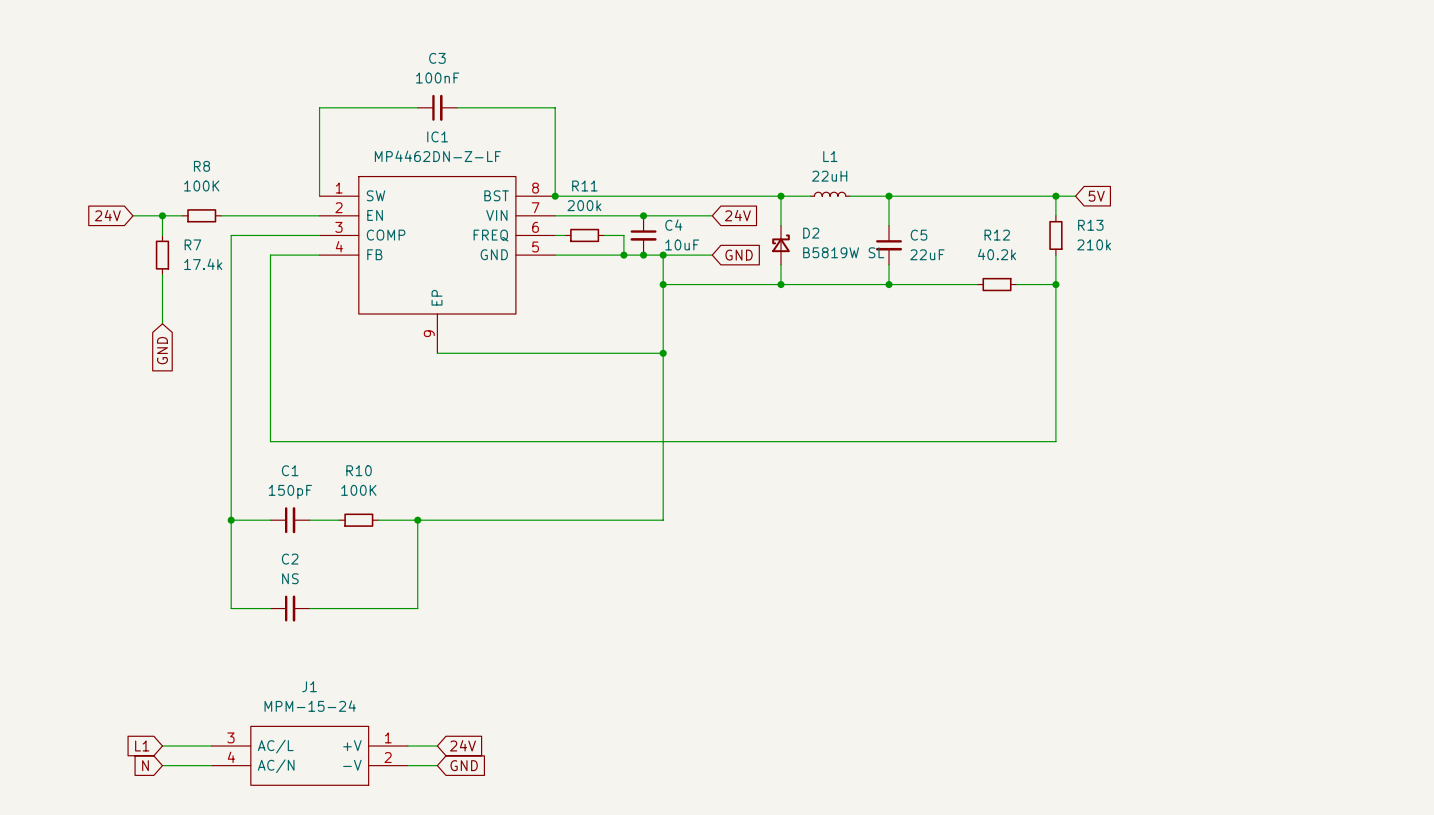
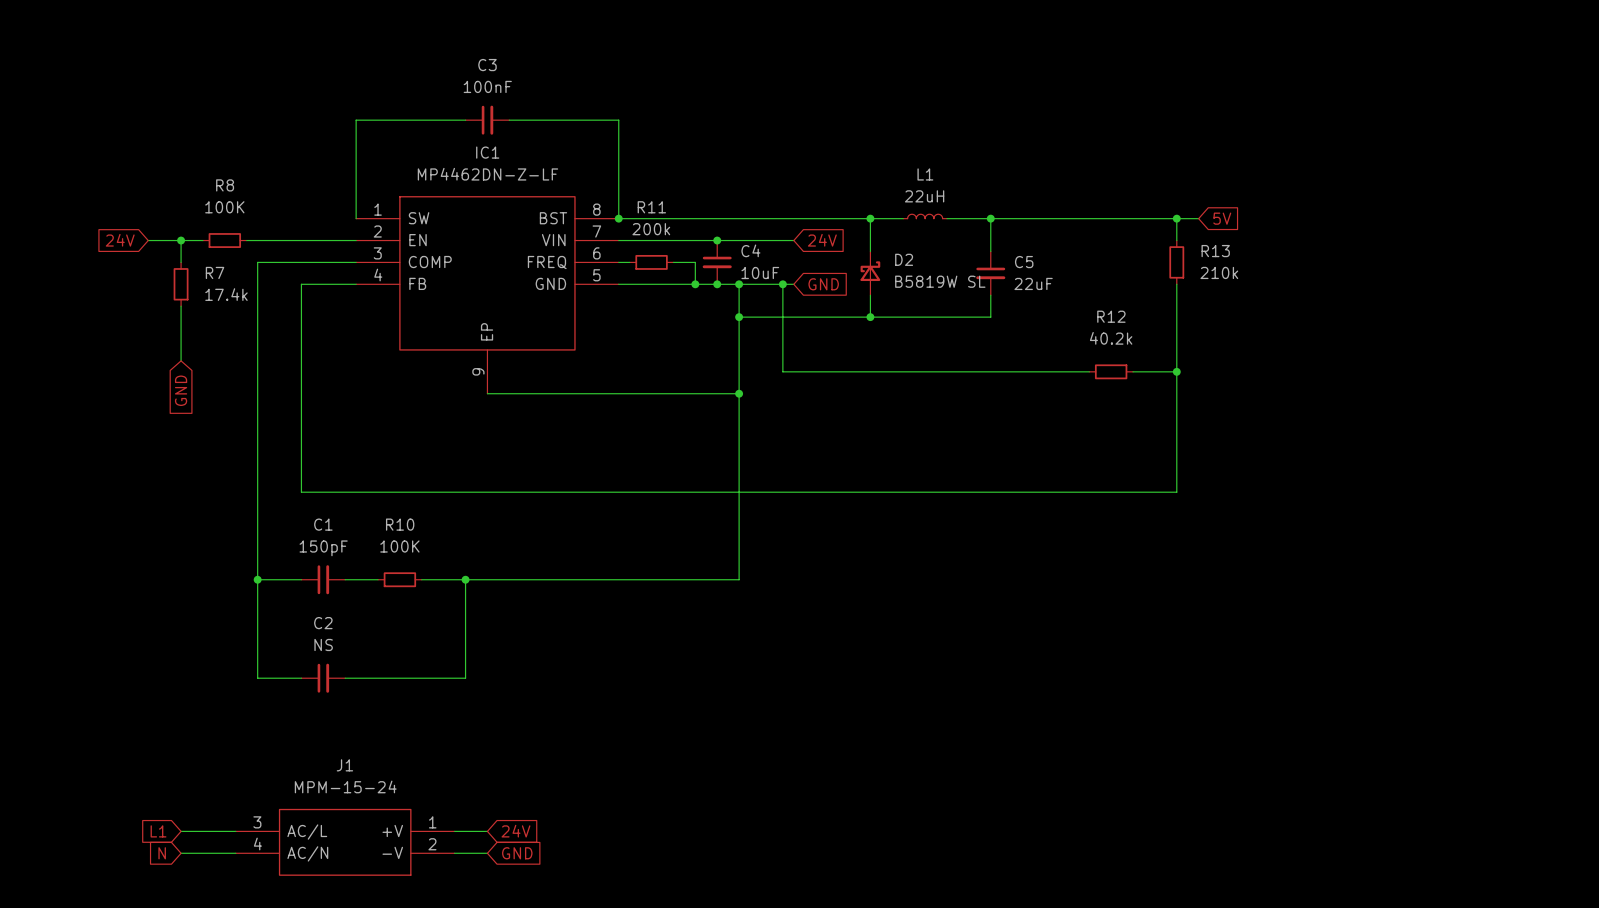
wire: none -> (782, 284) (782, 371) (1089, 371)
junction: none -> (782, 284)
wire: (889, 284) (977, 284) -> none
junction: (889, 284) -> none
R12 position: (997, 284) -> (1111, 371)
wire: (1016, 284) (1055, 284) -> (1133, 371) (1176, 371)
junction: (1055, 284) -> none
junction: none -> (1176, 371)

